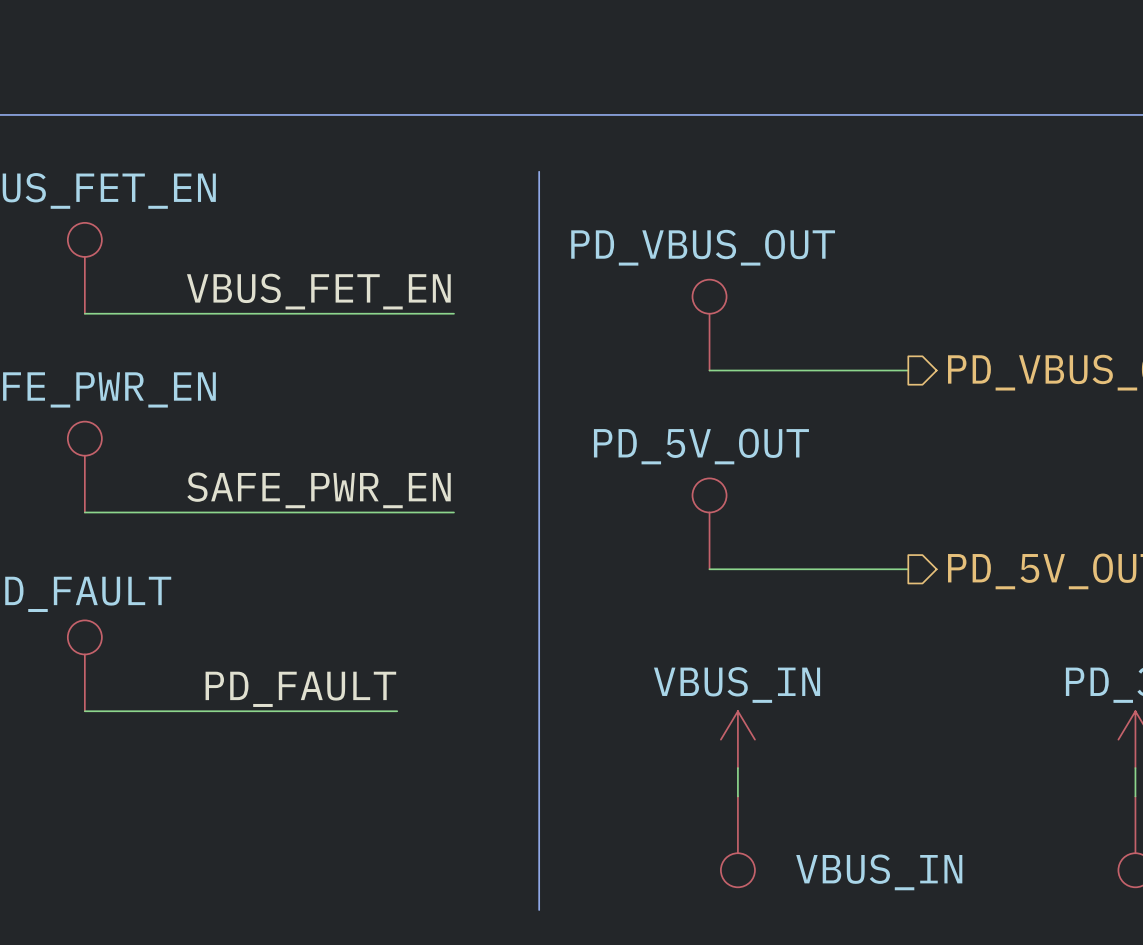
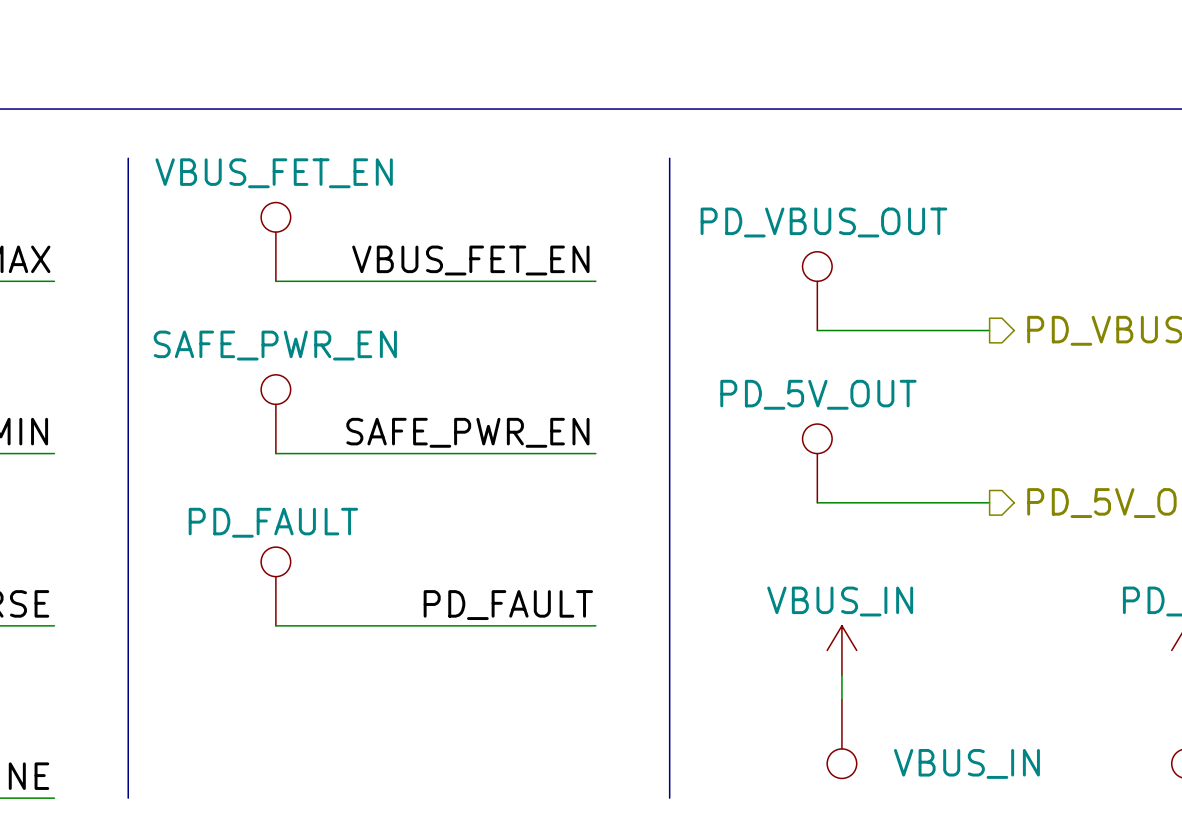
label position: PD_FAULT (300, 689) -> PD_FAULT (508, 605)
wire: none -> (546, 625) (595, 625)

